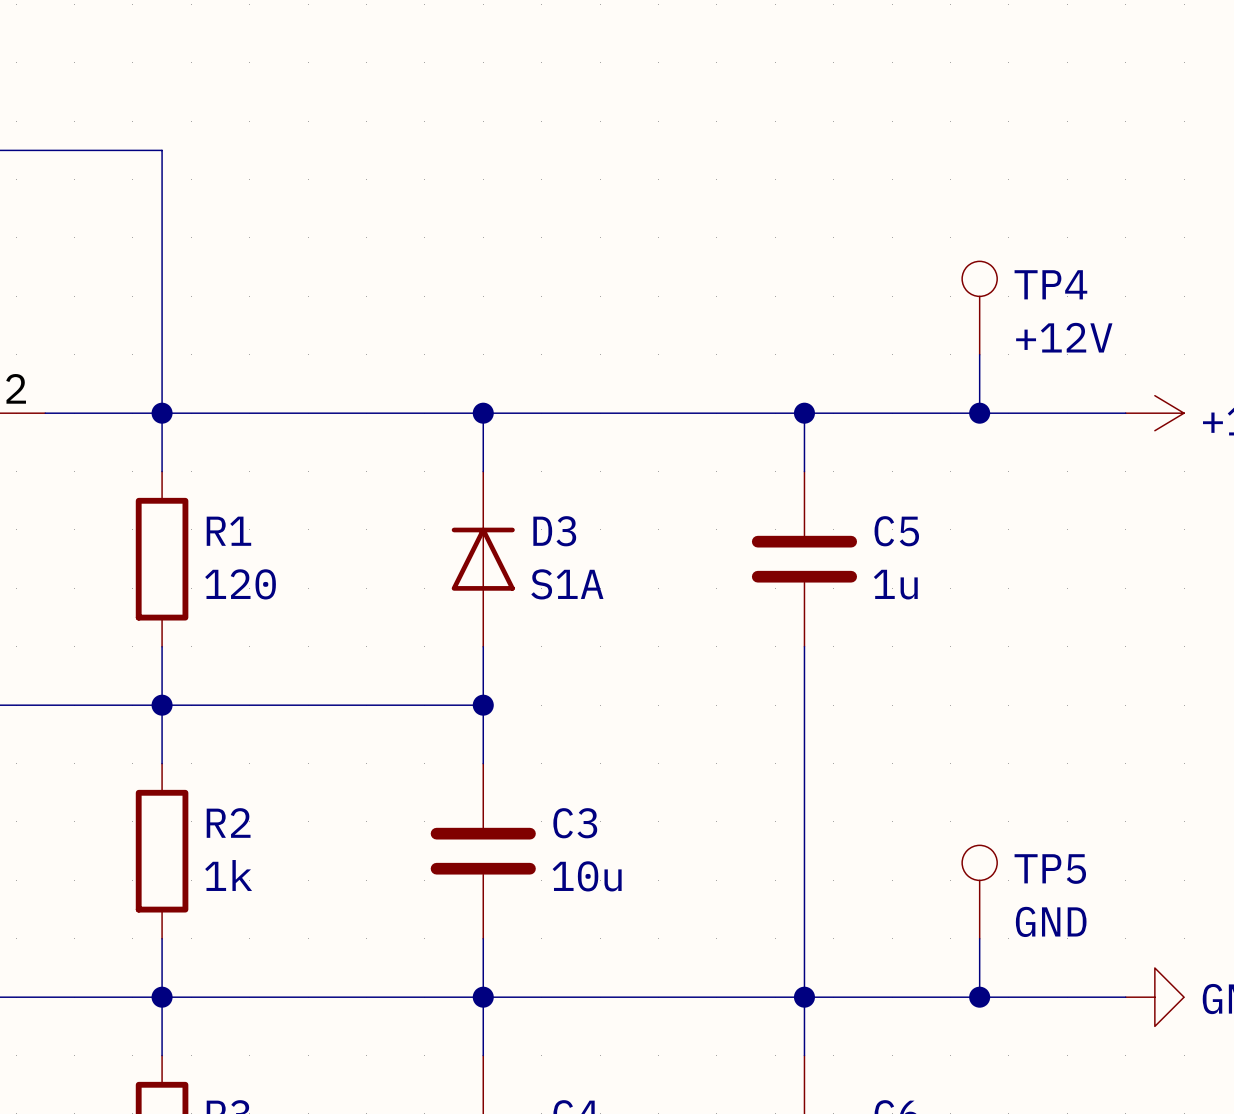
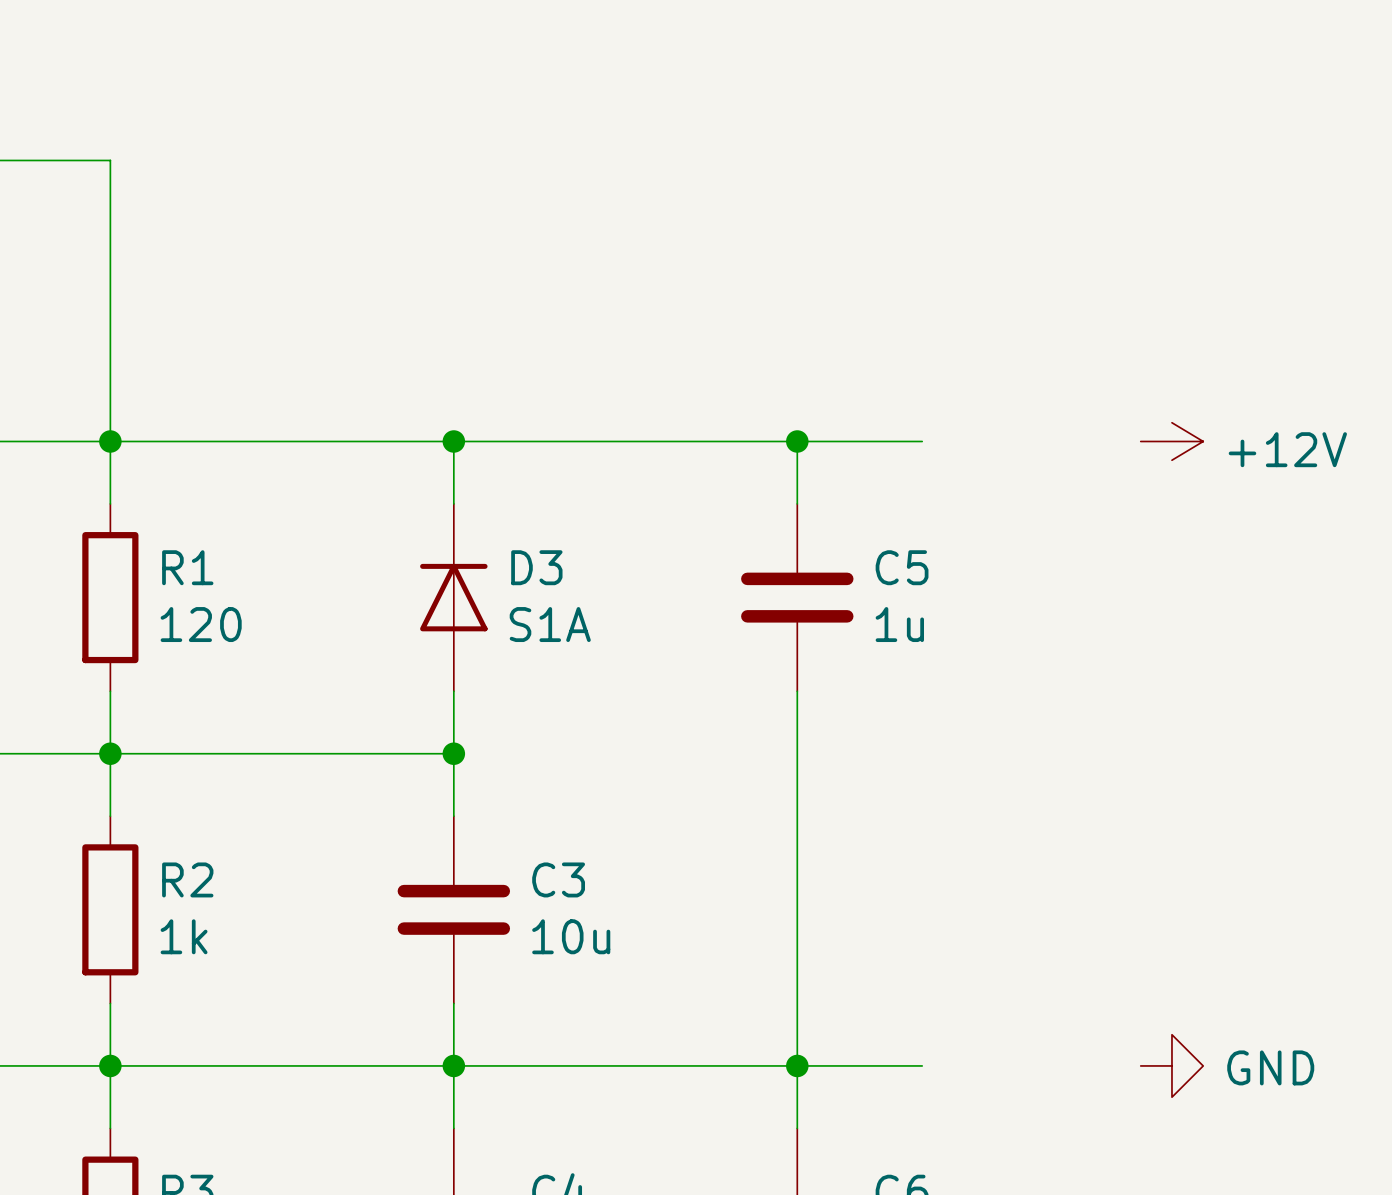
TP4: +12V (979, 308) -> none
wire: (979, 354) (979, 413) -> none
wire: (921, 413) (1125, 413) -> none
junction: (979, 413) -> none
TP5: GND (979, 892) -> none
wire: (979, 938) (979, 997) -> none
wire: (921, 997) (1125, 997) -> none
junction: (979, 997) -> none

